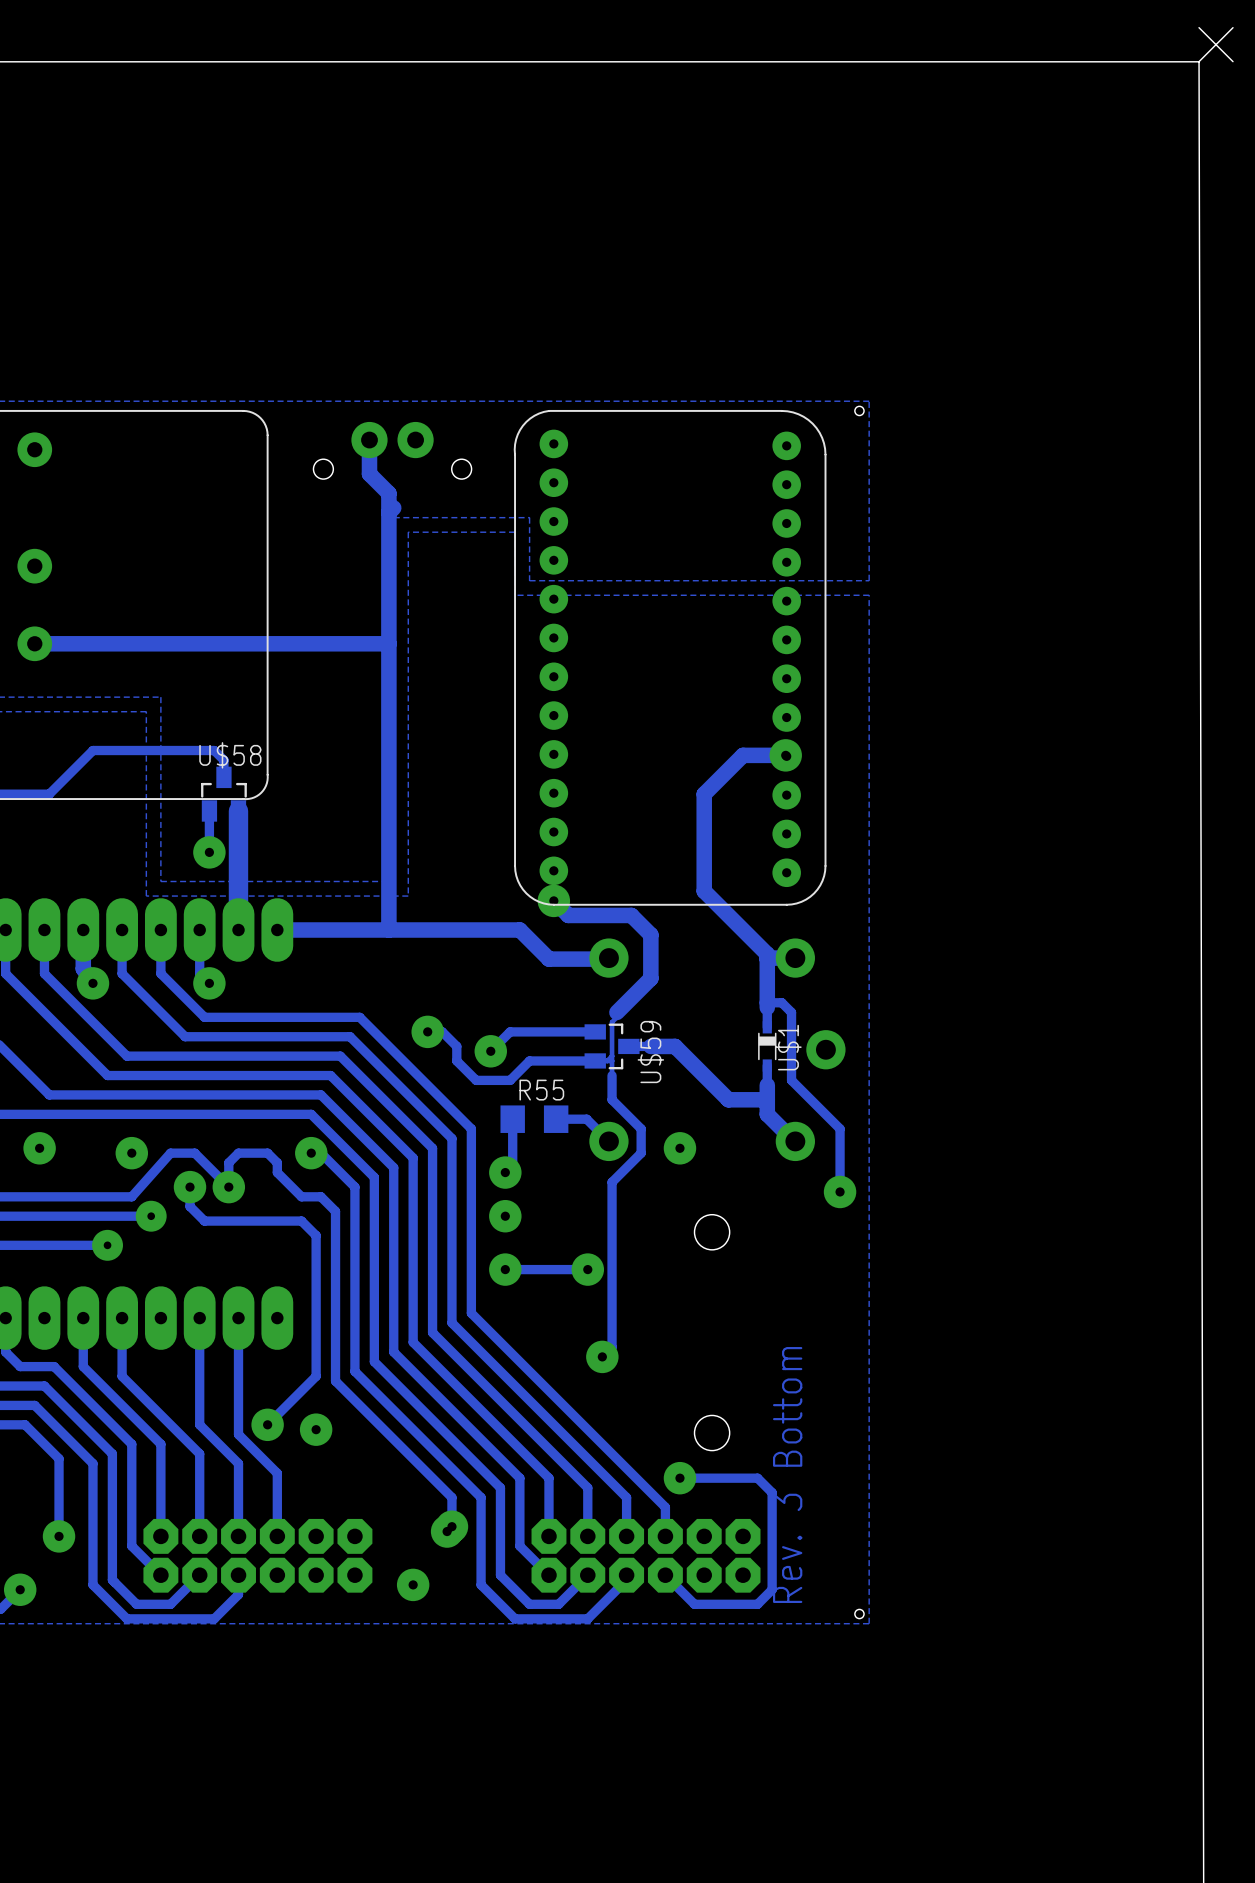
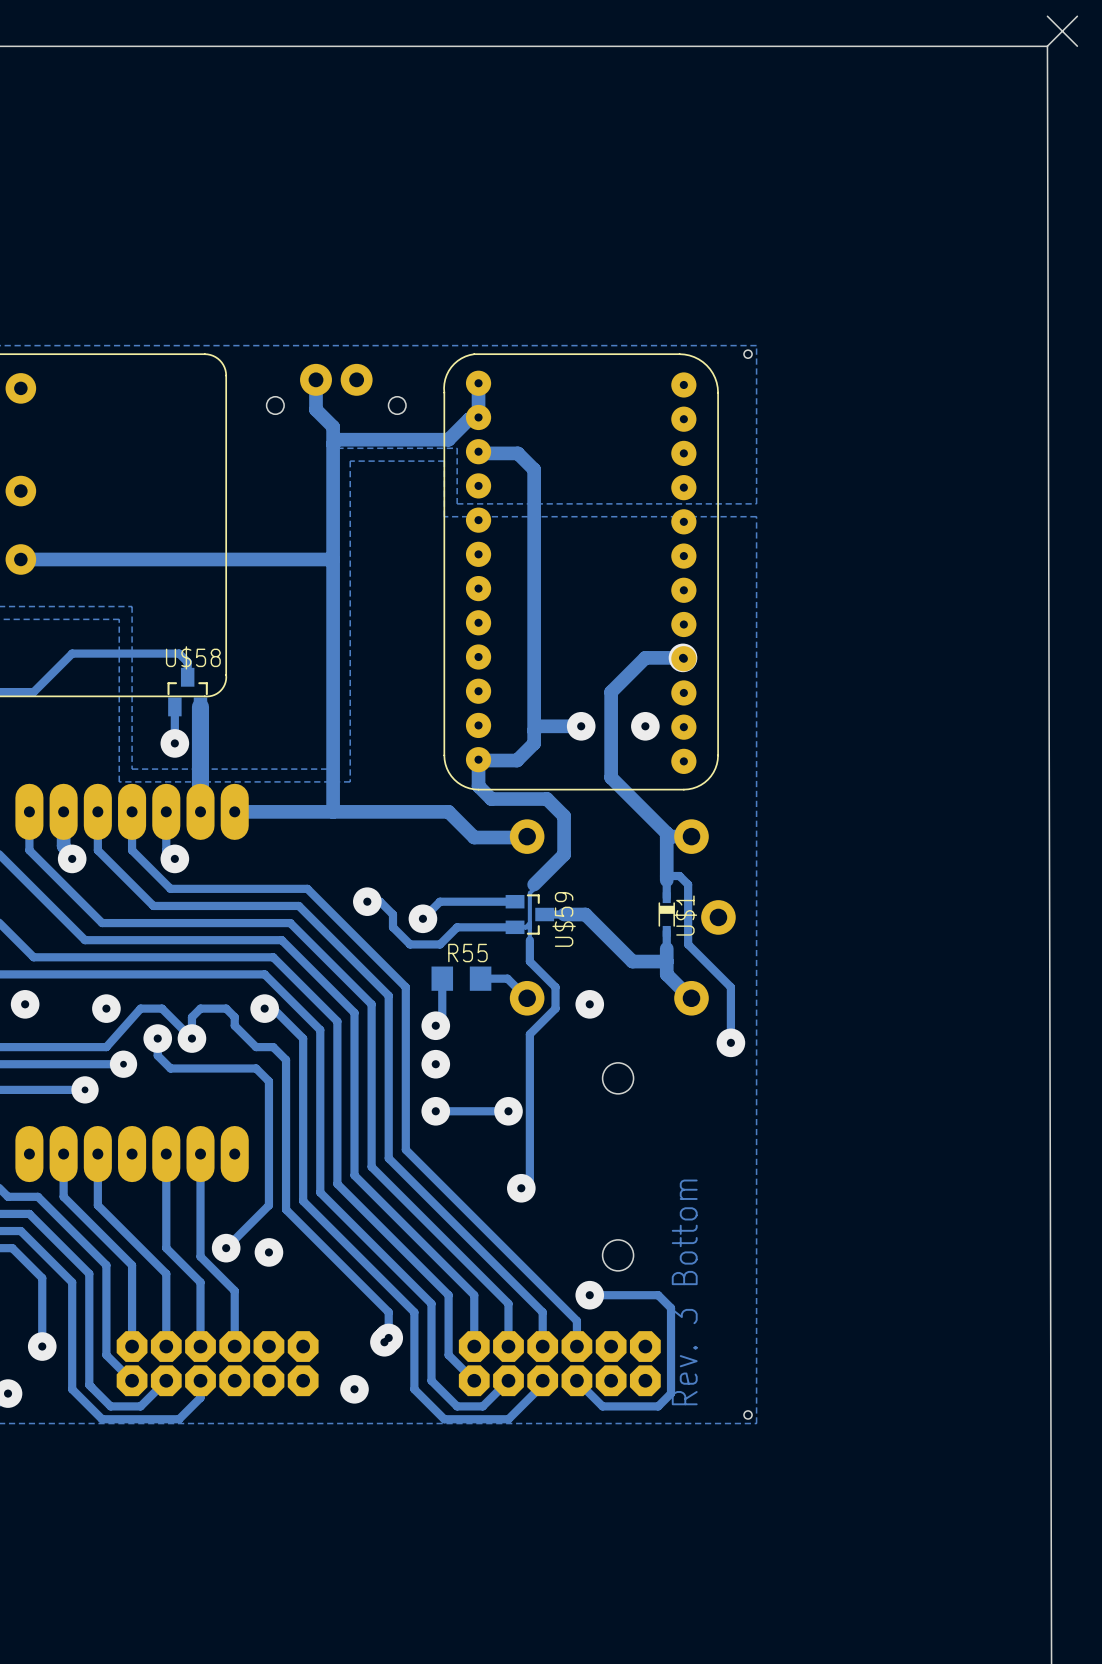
track: none -> (478, 384) (478, 419) (469, 419) (448, 439) (337, 439)
track: none -> (478, 453) (517, 453) (534, 469) (534, 743) (517, 760) (479, 760) (478, 786)
track: none -> (581, 726) (538, 726) (534, 730)
via: none -> (581, 726)
via: none -> (645, 726)
via: (553, 900) -> none

